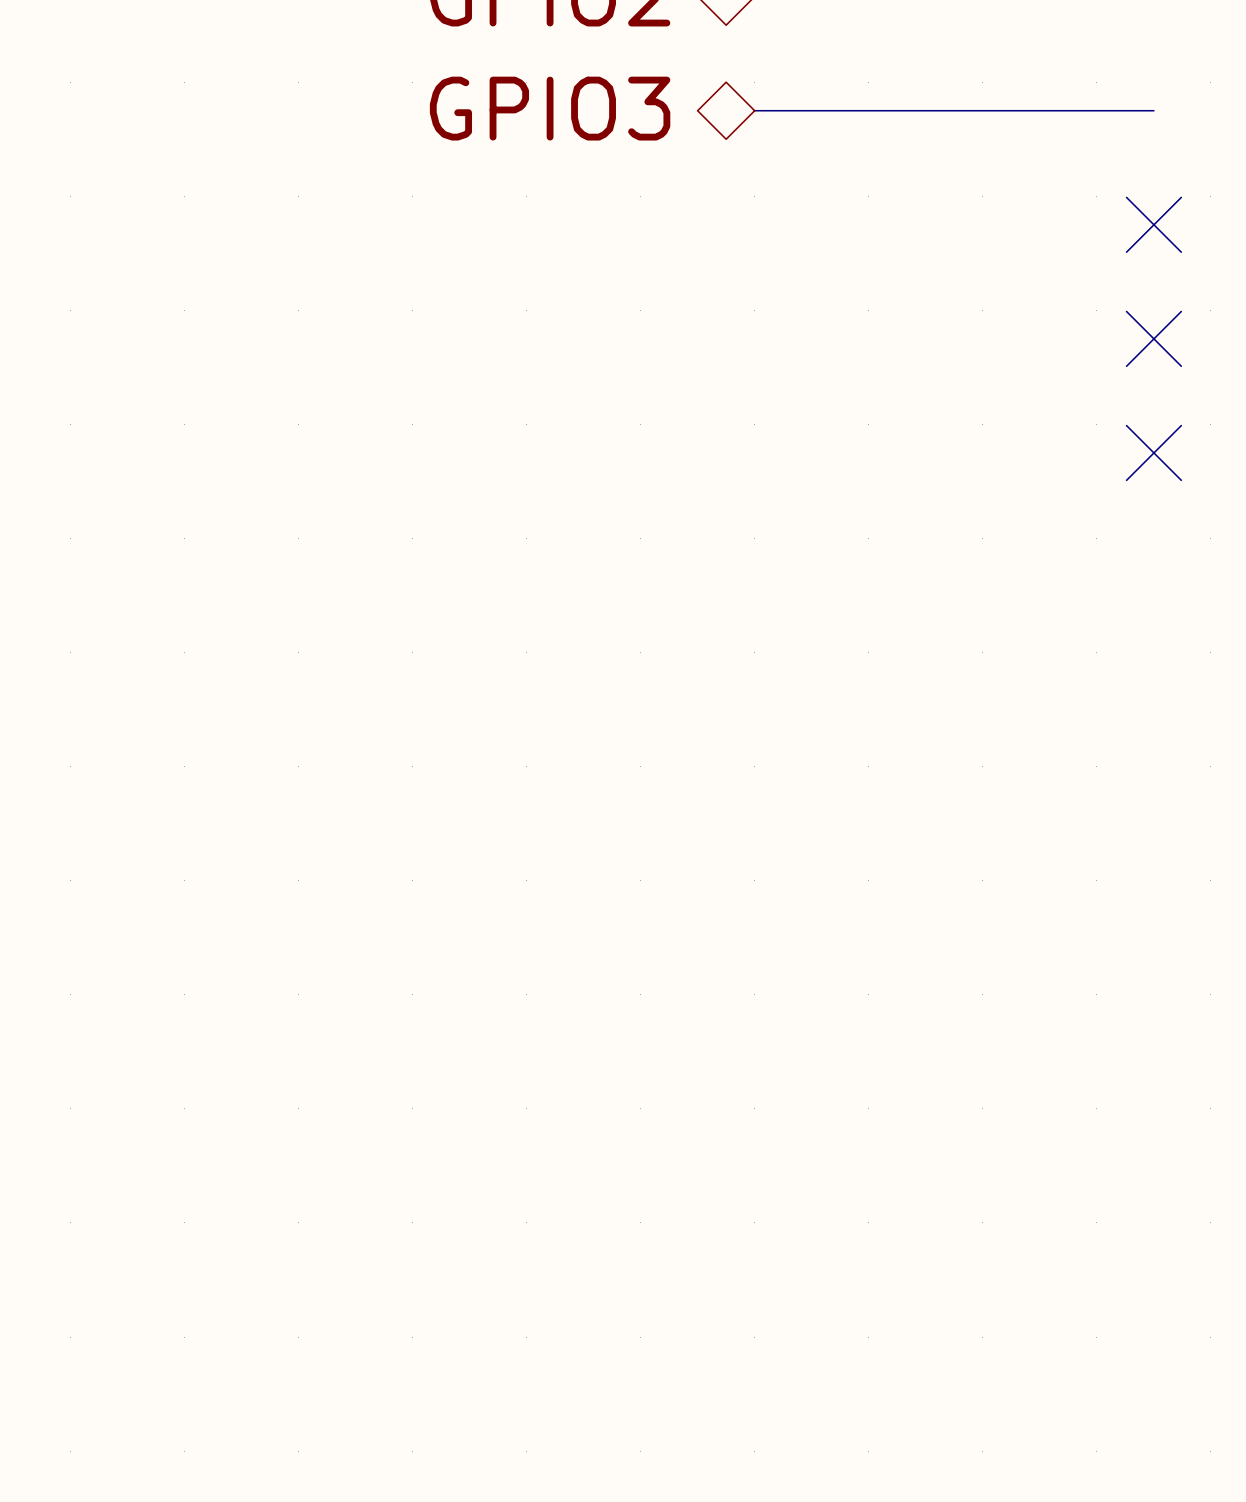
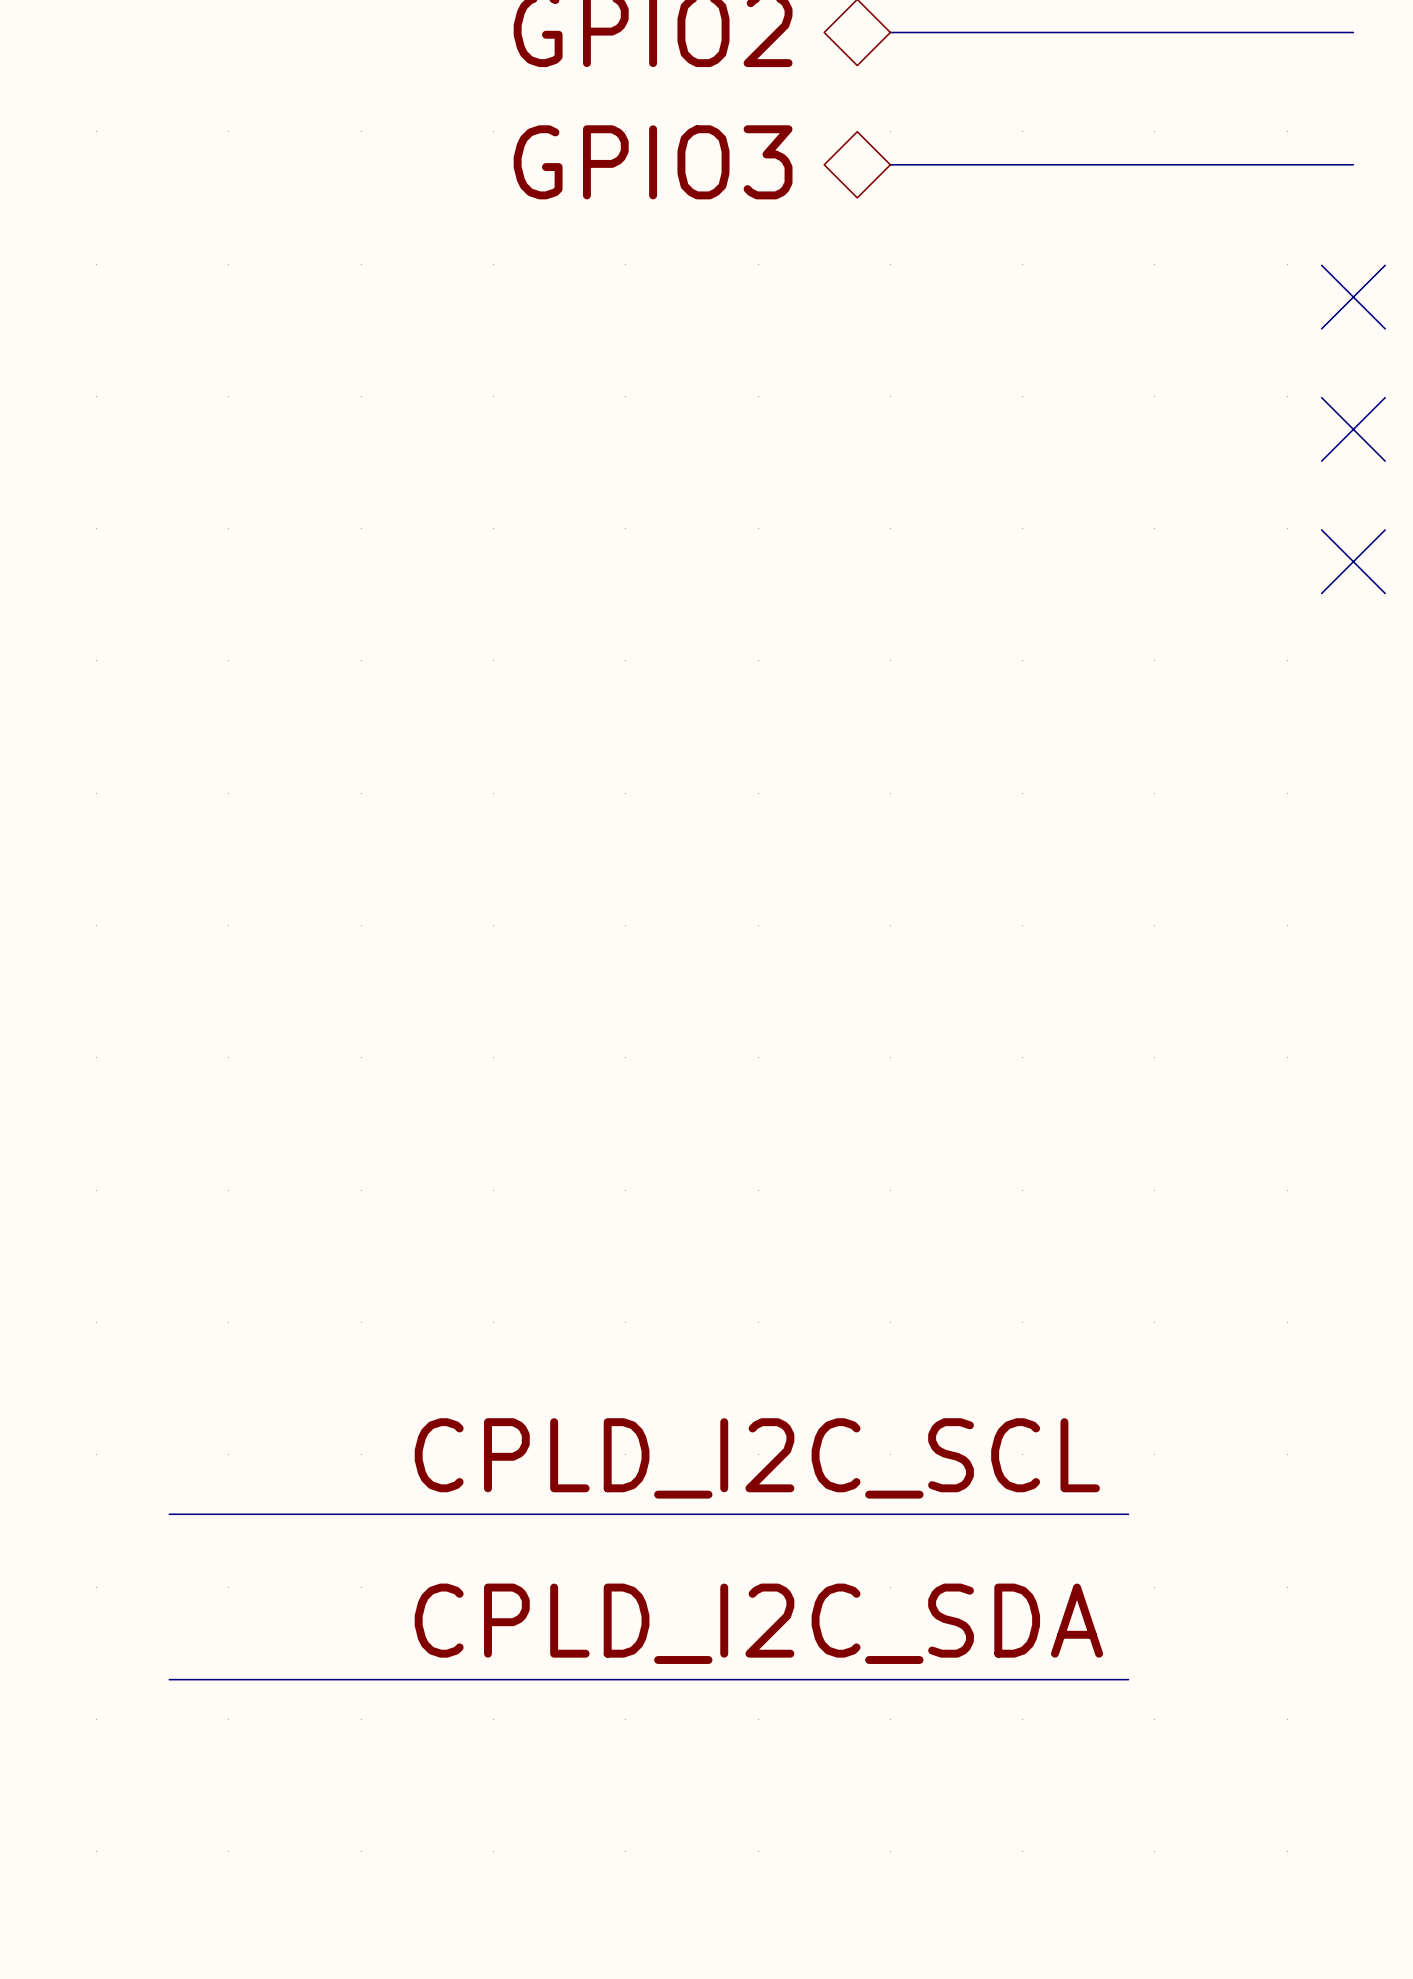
label: none -> CPLD_I2C_SCL (757, 1458)
wire: none -> (169, 1514) (1128, 1514)
label: none -> CPLD_I2C_SDA (758, 1623)
wire: none -> (169, 1679) (1128, 1679)

